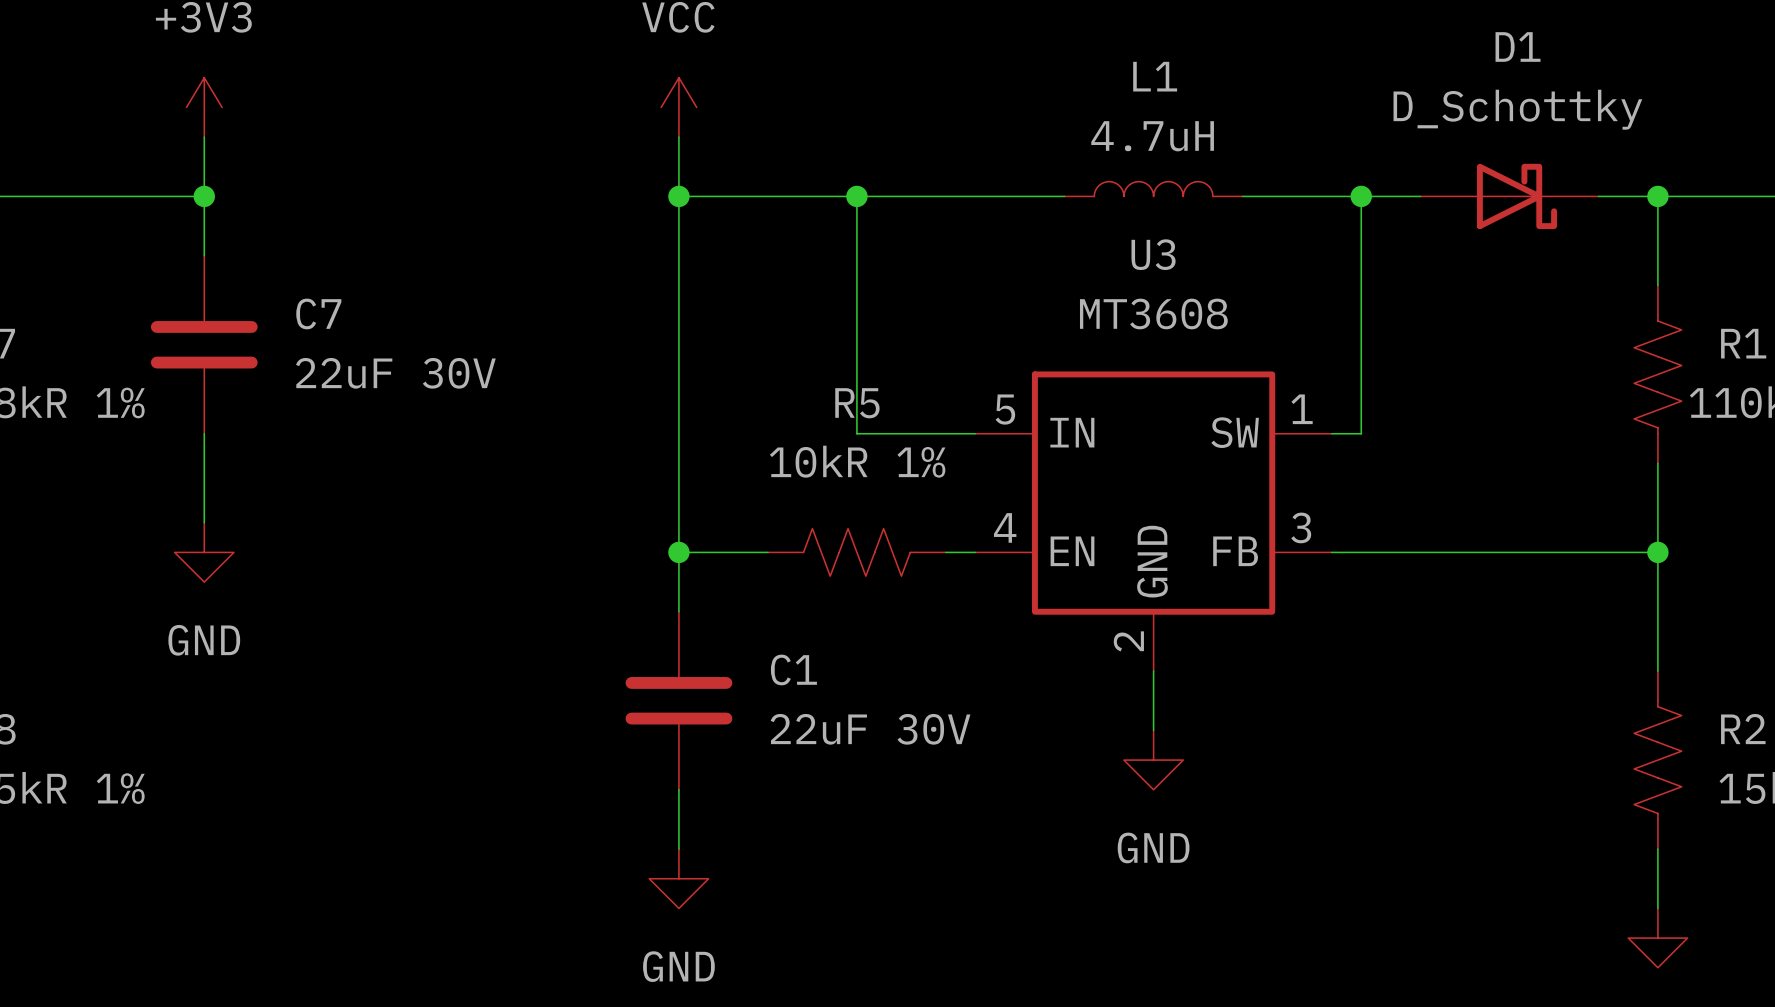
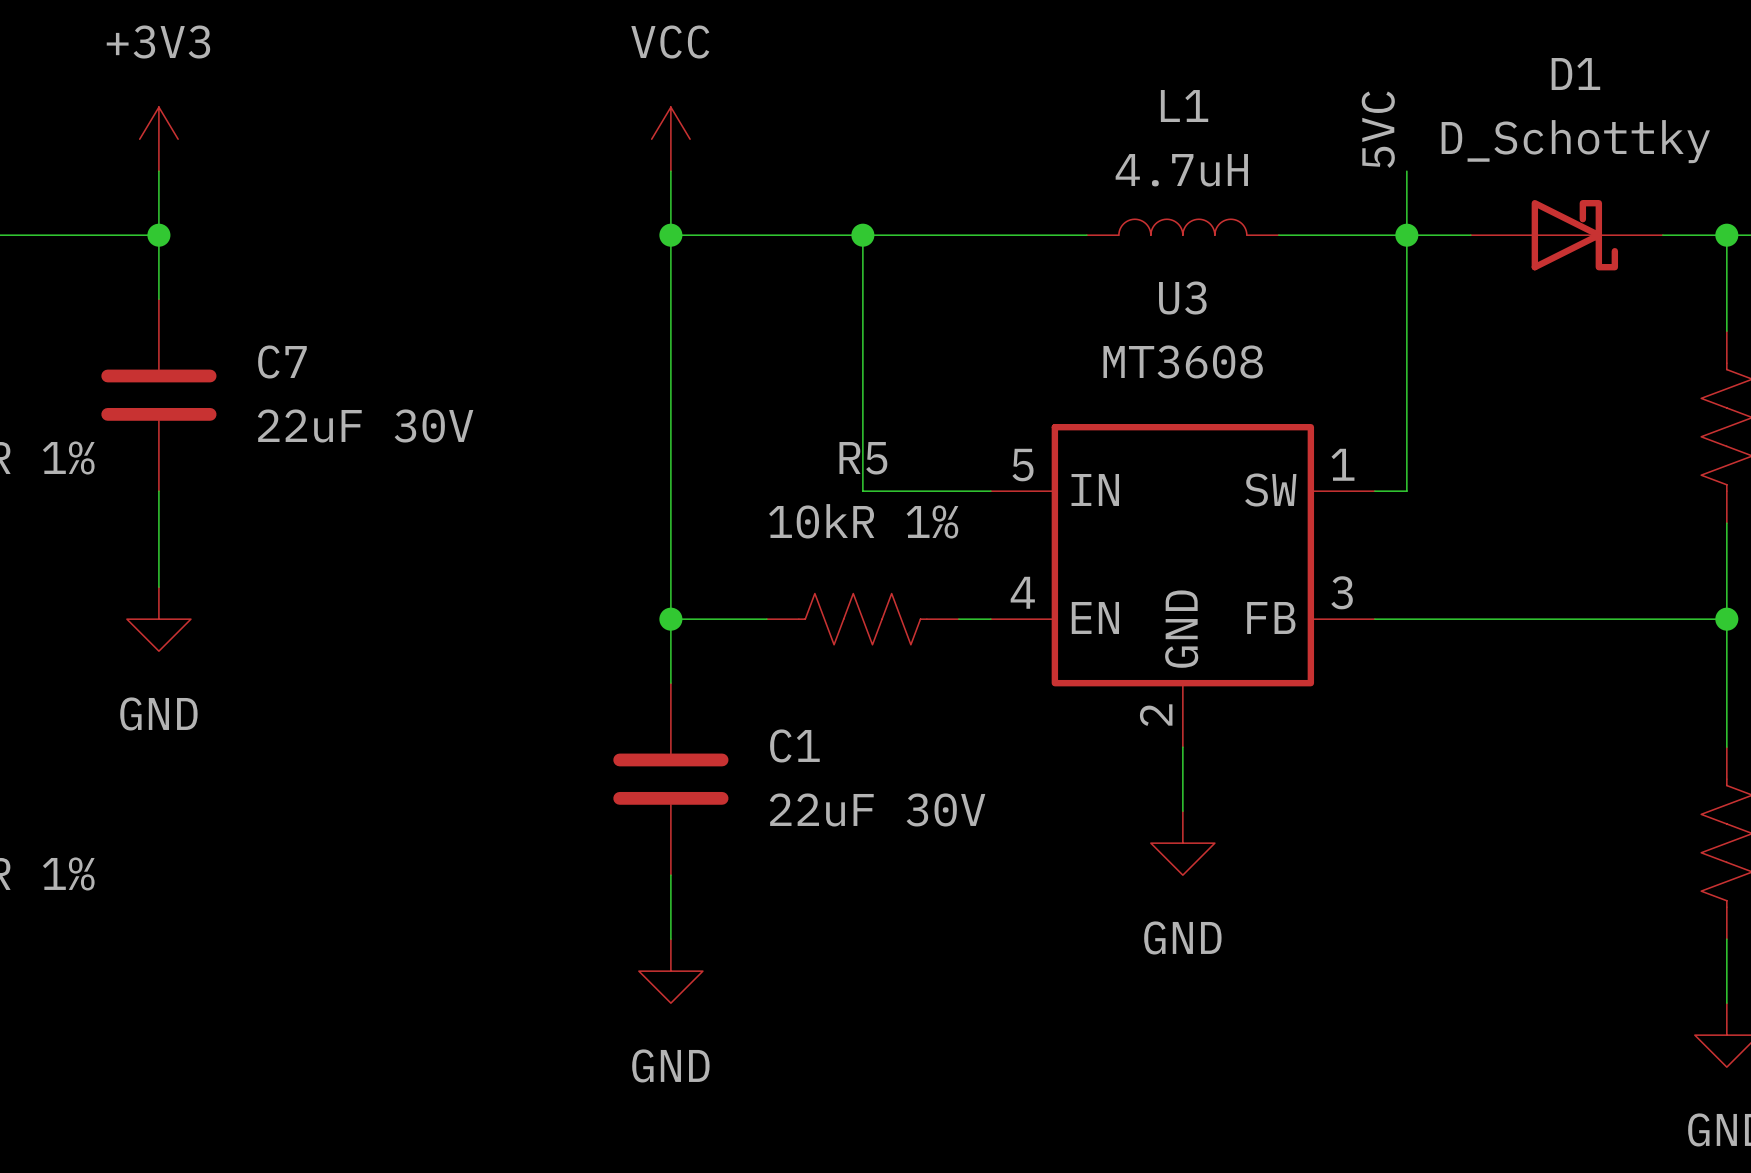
label: none -> 5VC (1378, 129)
wire: none -> (1406, 171) (1406, 235)

